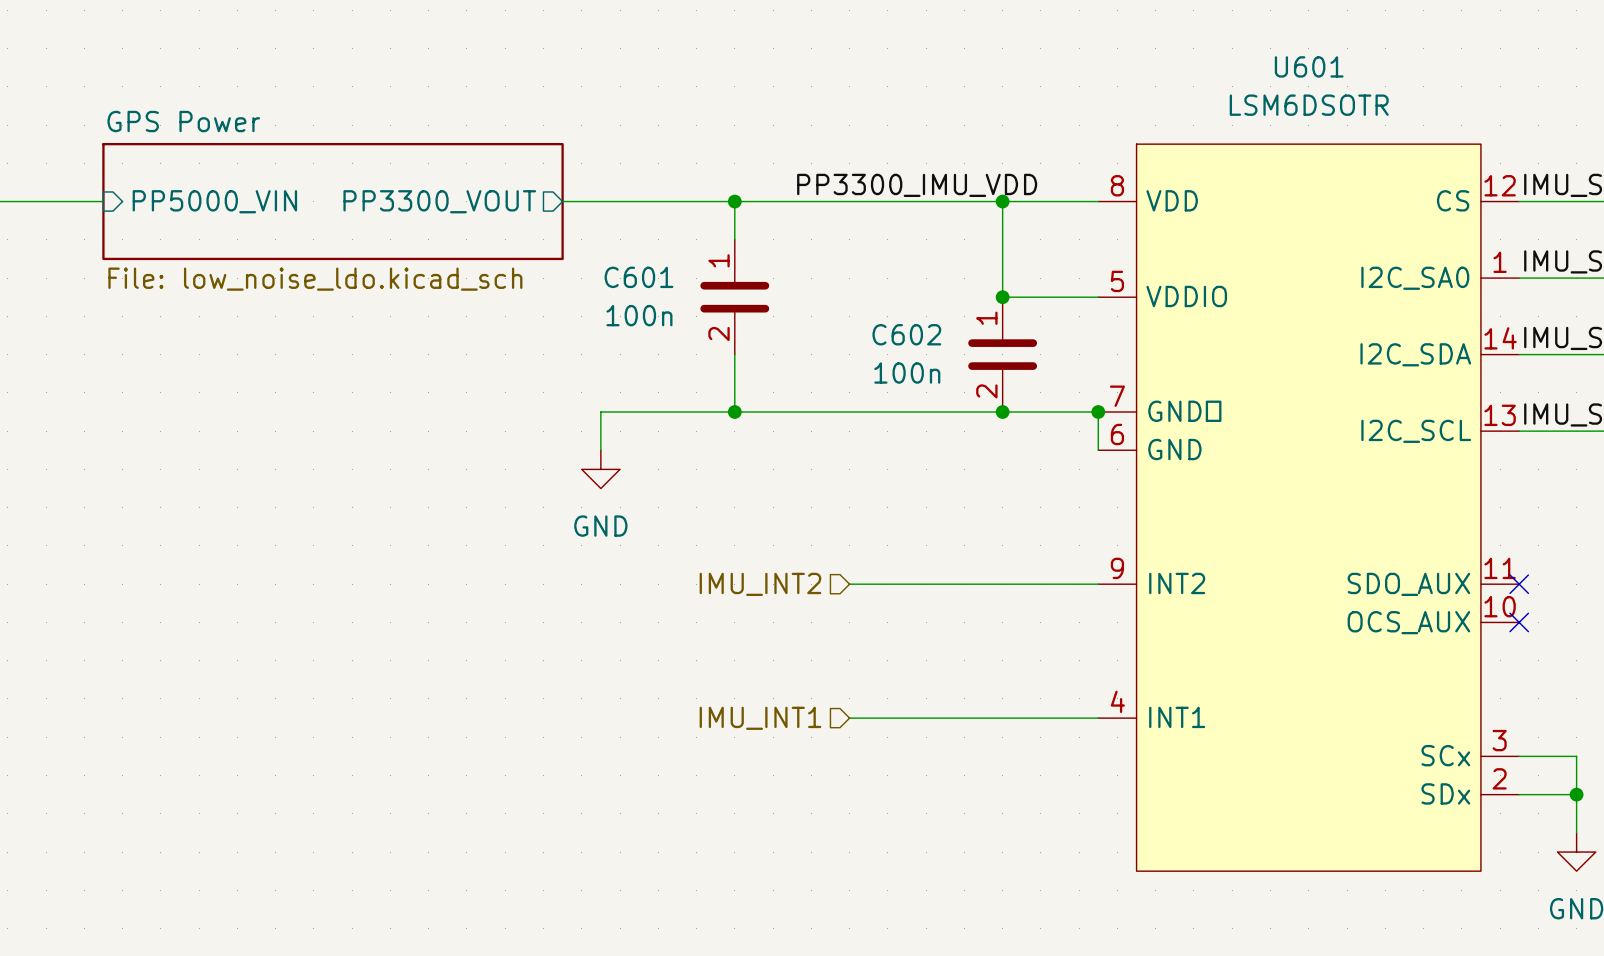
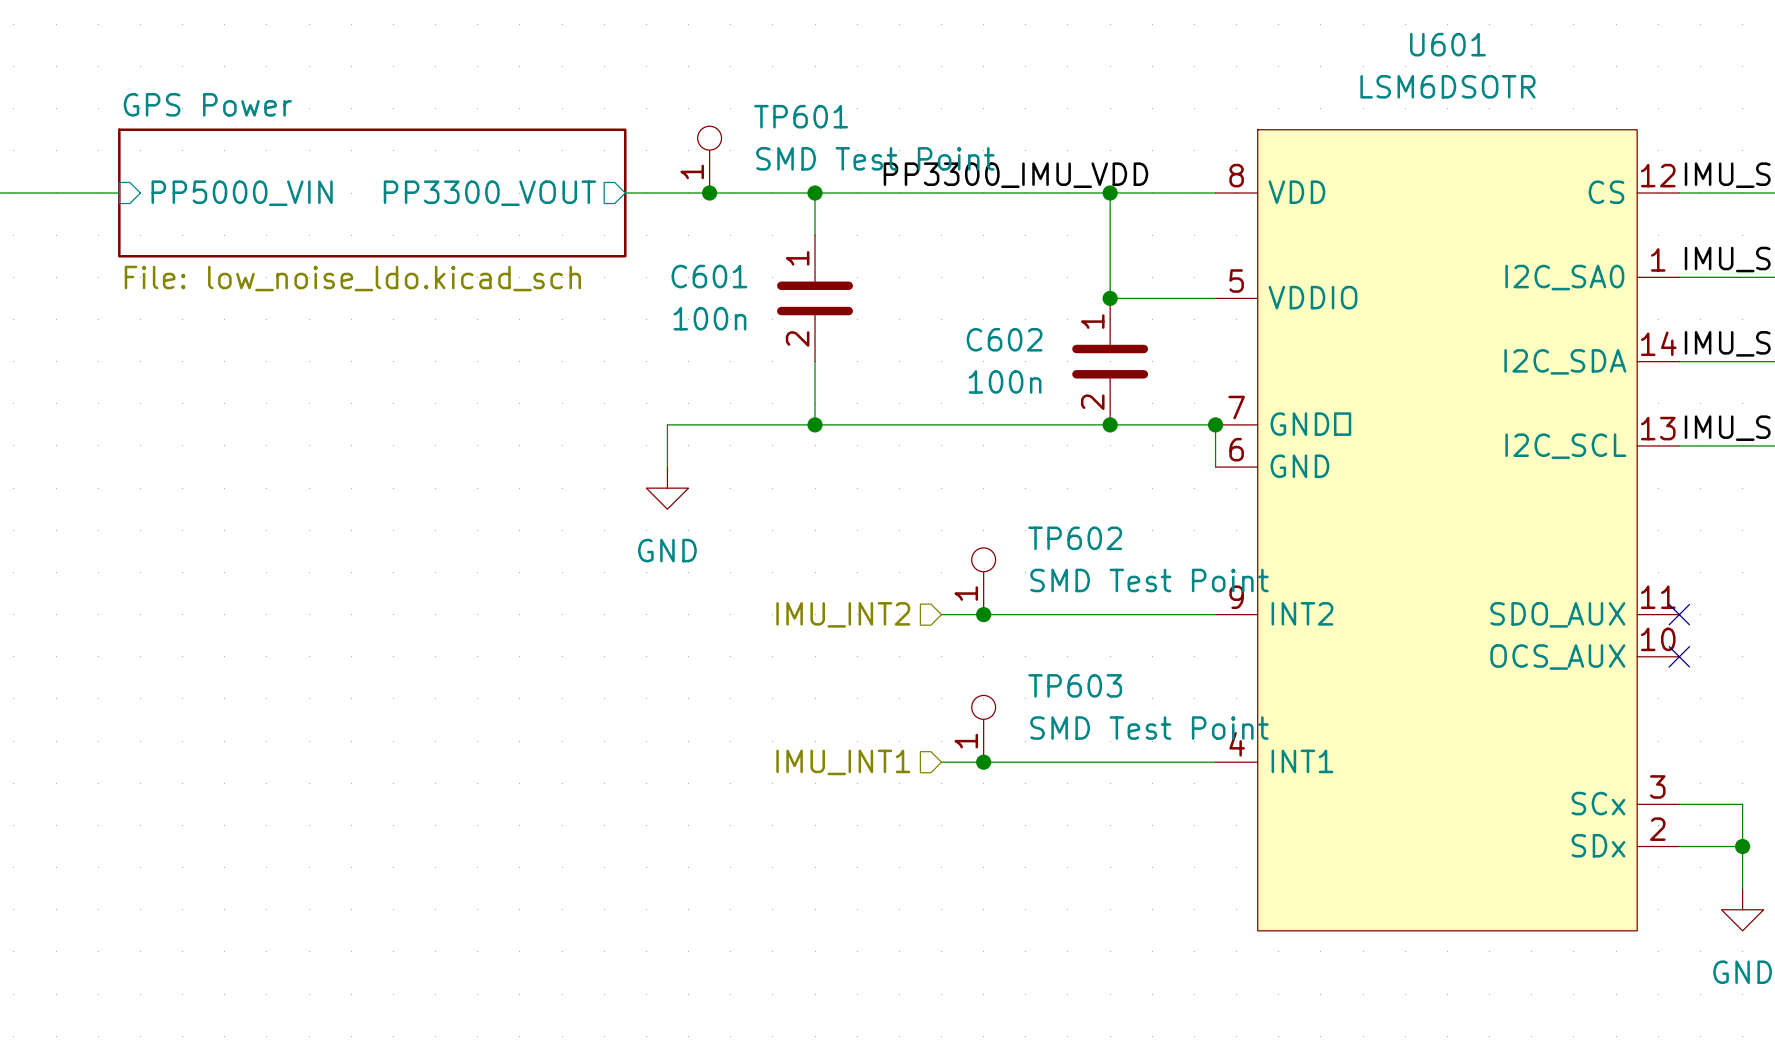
TP601: none -> SMD Test Point (709, 159)
junction: none -> (709, 193)
TP602: none -> SMD Test Point (983, 581)
junction: none -> (983, 614)
TP603: none -> SMD Test Point (983, 728)
junction: none -> (983, 762)

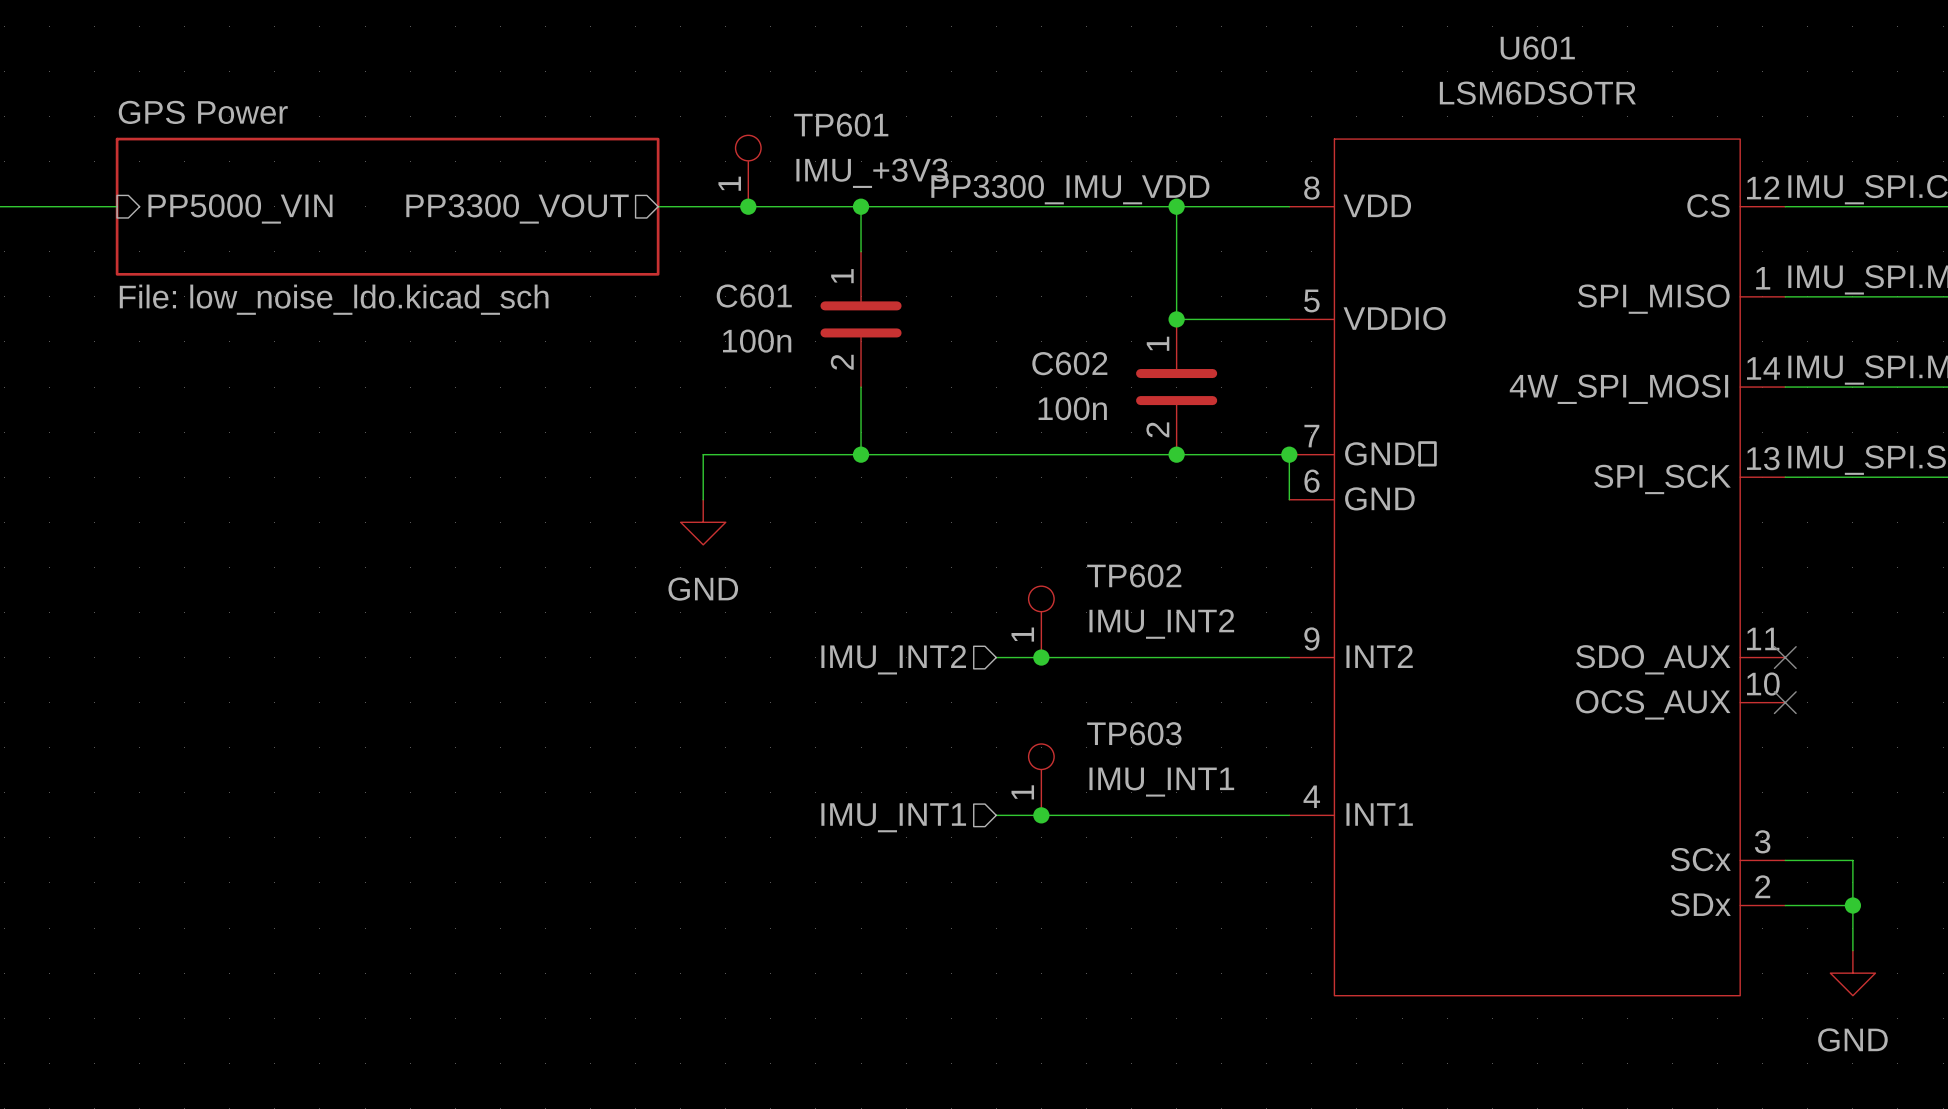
TP601 value: SMD Test Point (875, 158) -> IMU_+3V3 (872, 173)
U601 pin name: I2C_SA0 (1564, 277) -> SPI_MISO (1653, 299)
U601 pin name: I2C_SDA (1565, 361) -> 4W_SPI_MOSI (1618, 389)
U601 pin name: I2C_SCL (1565, 446) -> SPI_SCK (1662, 479)
TP602 value: SMD Test Point (1149, 580) -> IMU_INT2 (1161, 624)
TP603 value: SMD Test Point (1149, 728) -> IMU_INT1 (1161, 782)

